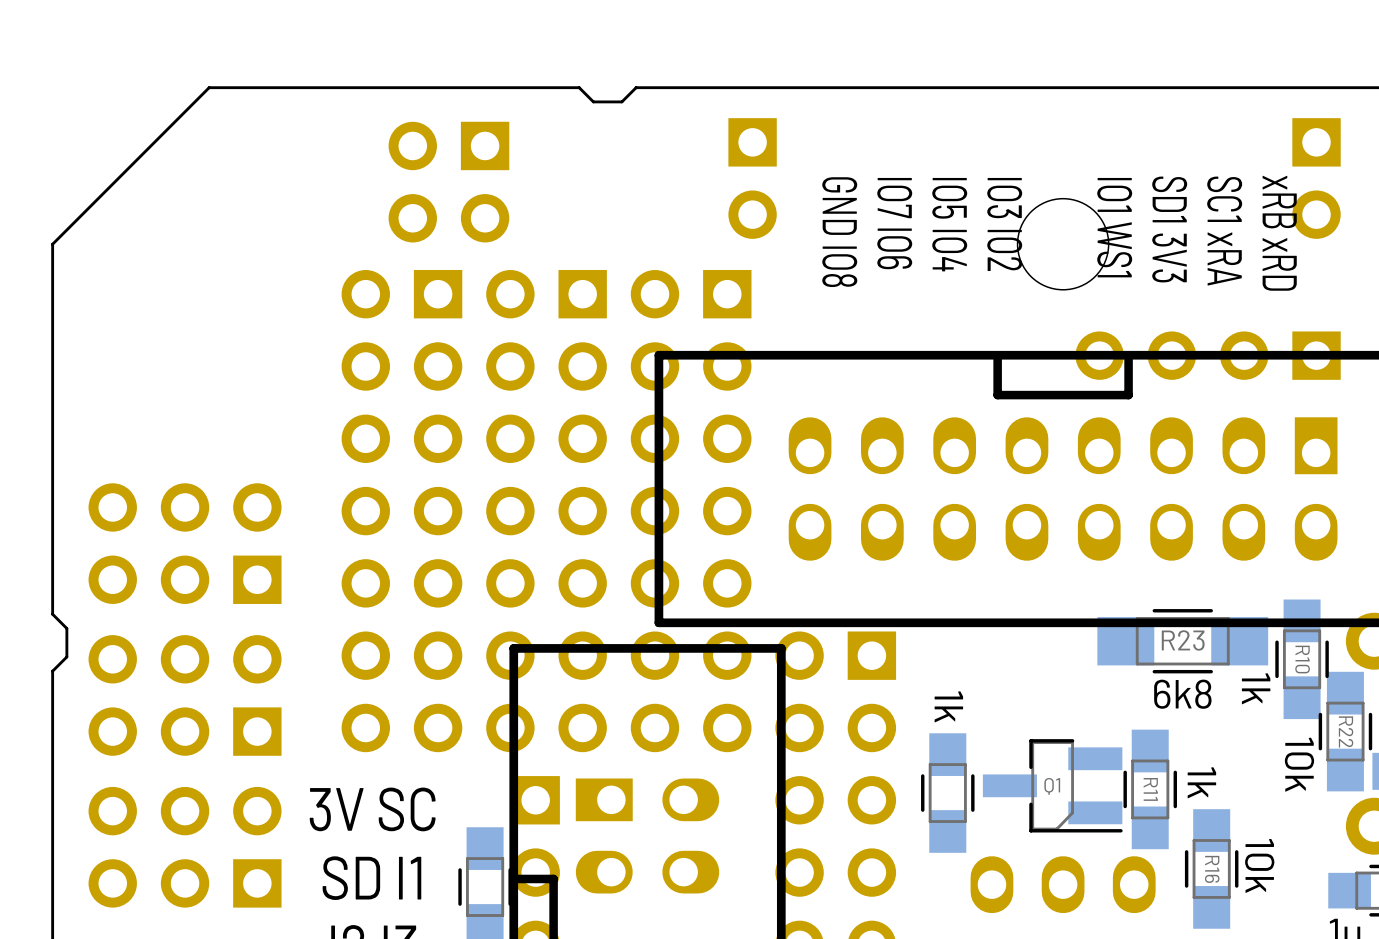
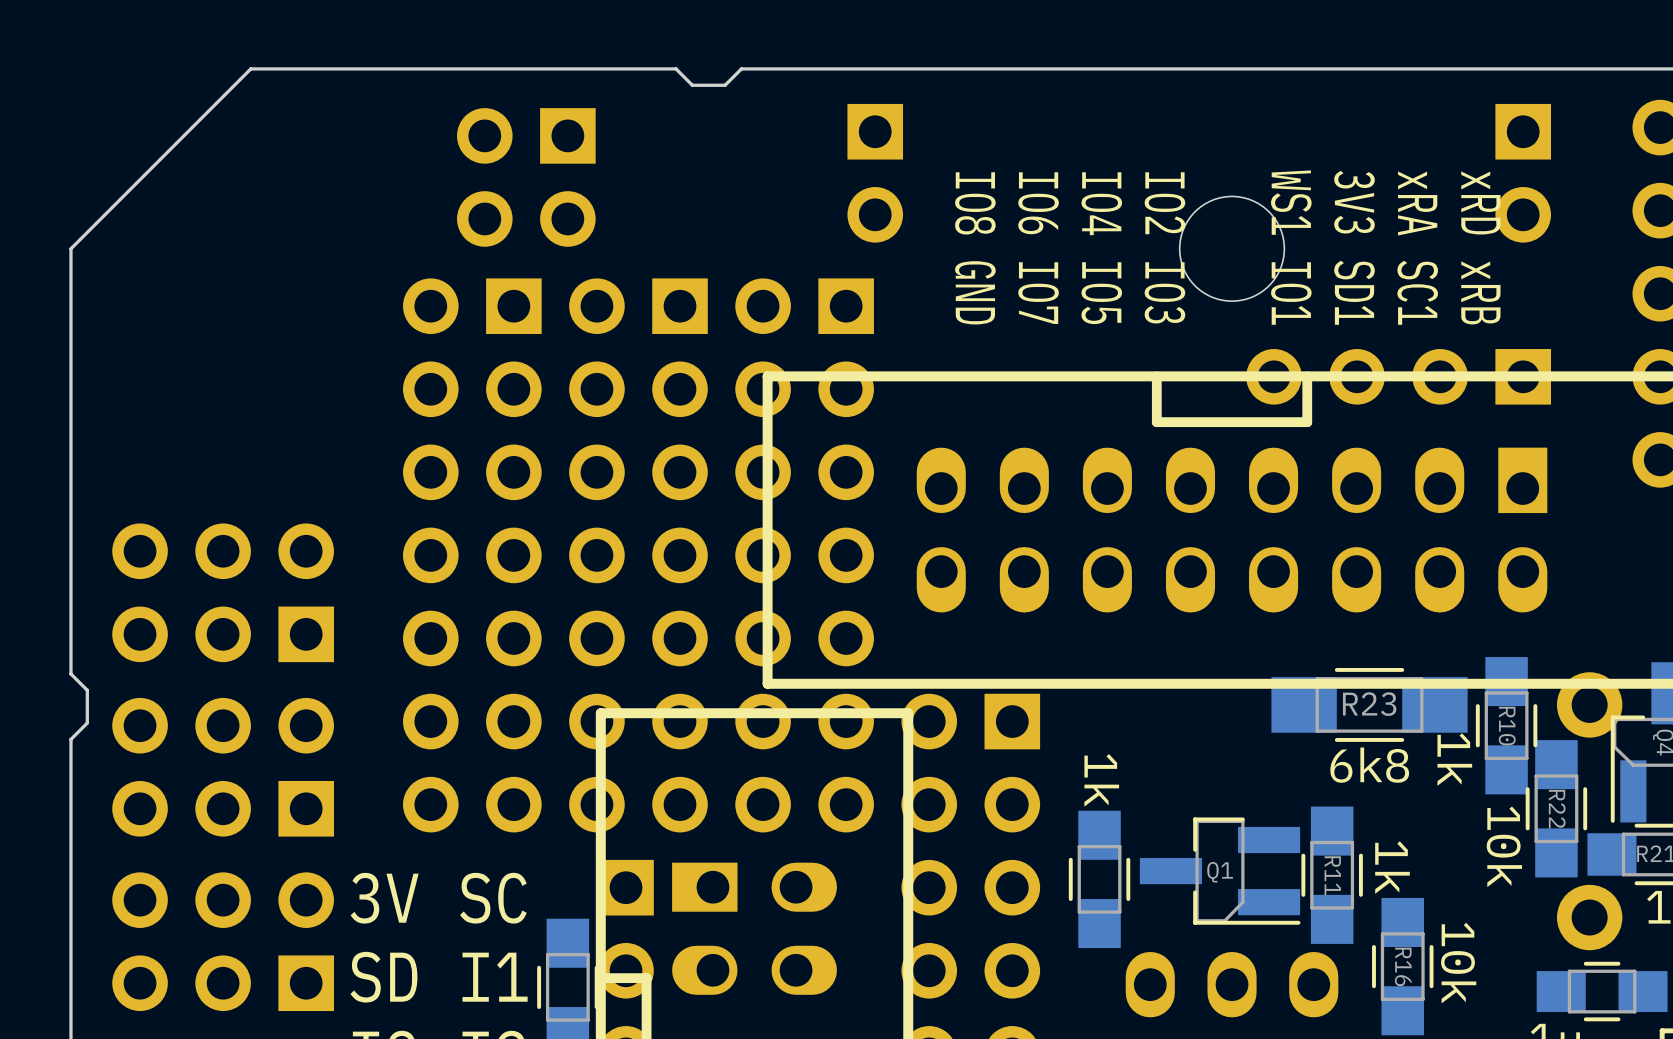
text: IO7 IO6 (894, 223) -> IO6 IO7 (1038, 248)
text: IO5 IO4 (949, 224) -> IO4 IO5 (1101, 248)
text: IO3 IO2 (1004, 224) -> IO2 IO3 (1164, 247)
text: IO1 WS1 (1114, 227) -> WS1 IO1 (1291, 247)
text: SD1 3V3 (1169, 229) -> 3V3 SD1 (1354, 247)
text: SC1 xRA (1224, 231) -> xRA SC1 (1417, 248)
text: GND IO8 (839, 232) -> IO8 GND (975, 248)
text: xRB xRD (1279, 233) -> xRD xRB (1480, 247)

